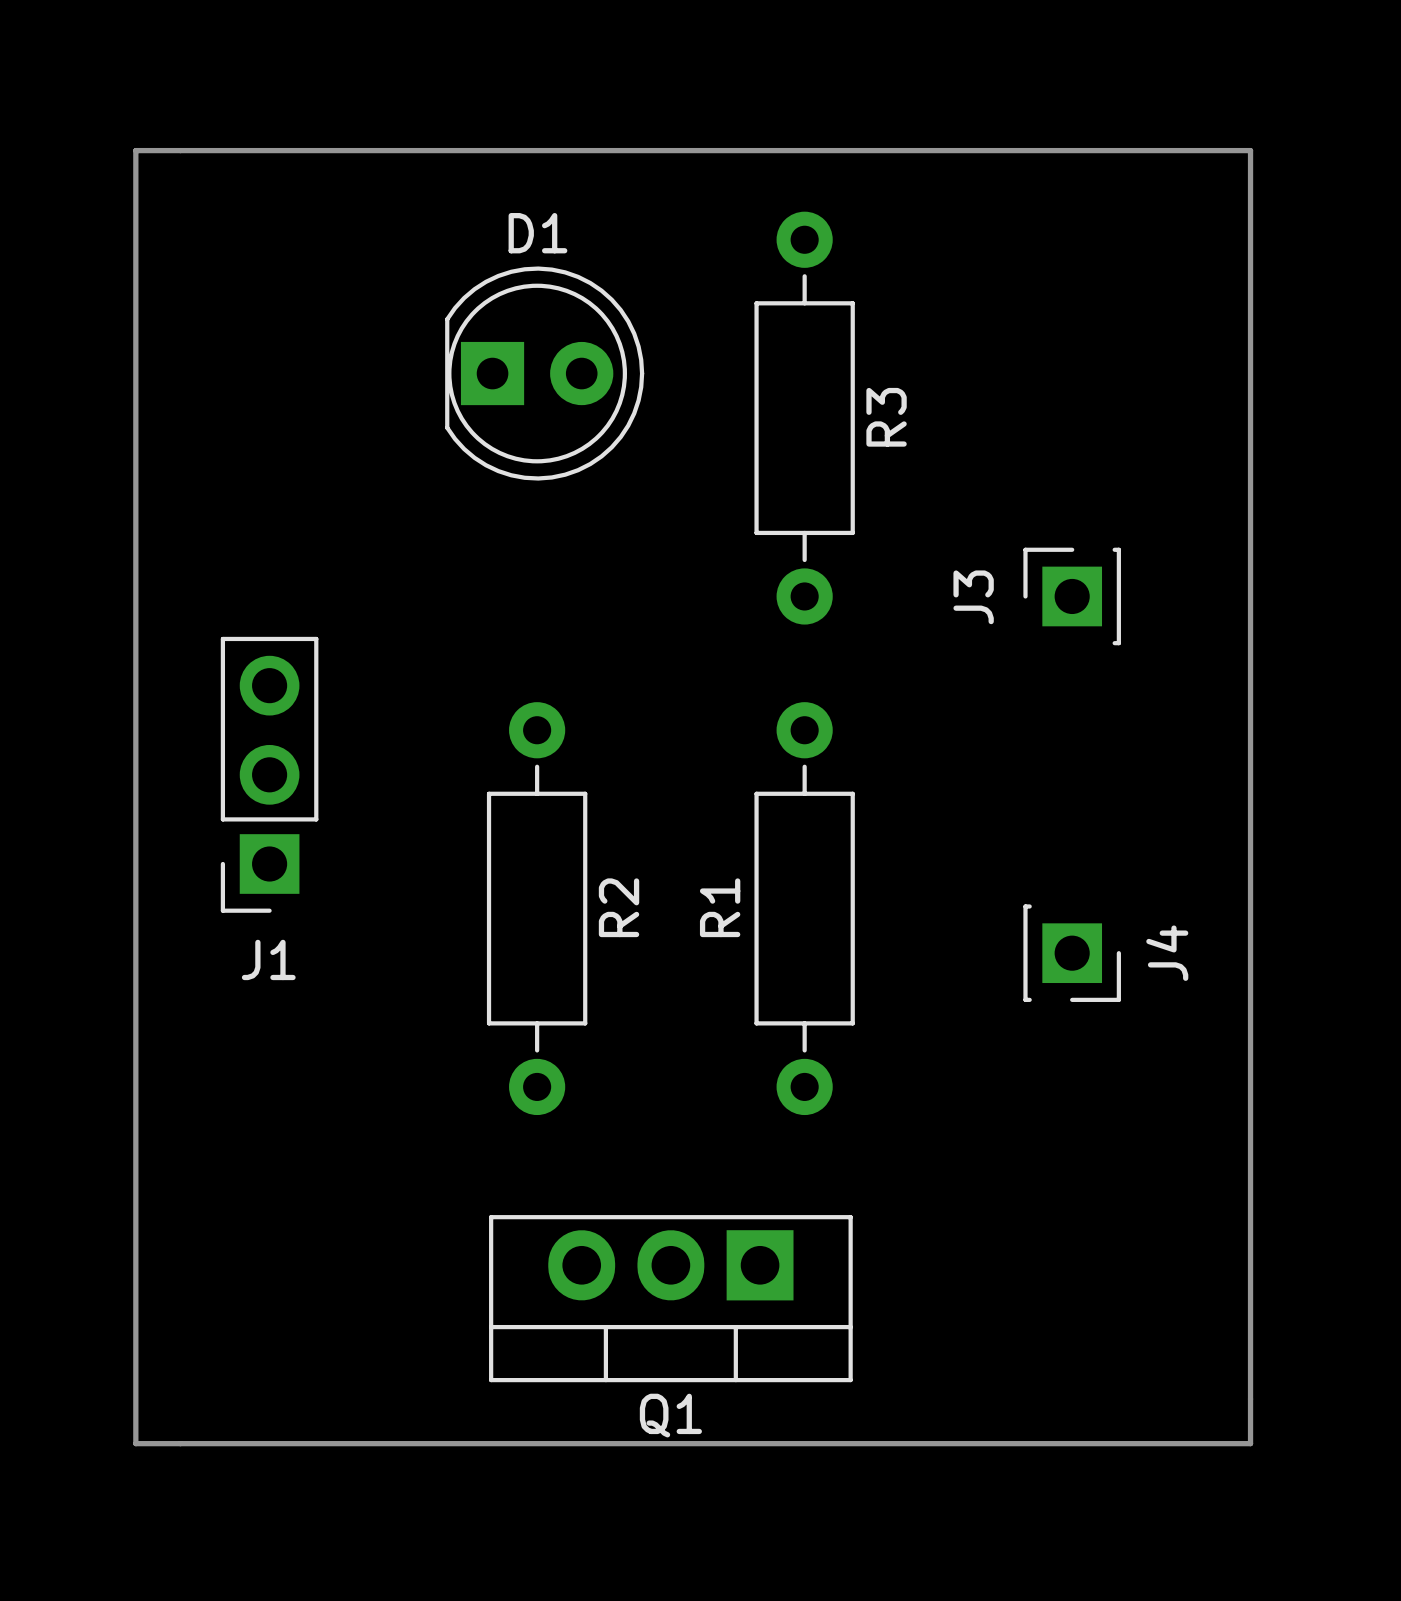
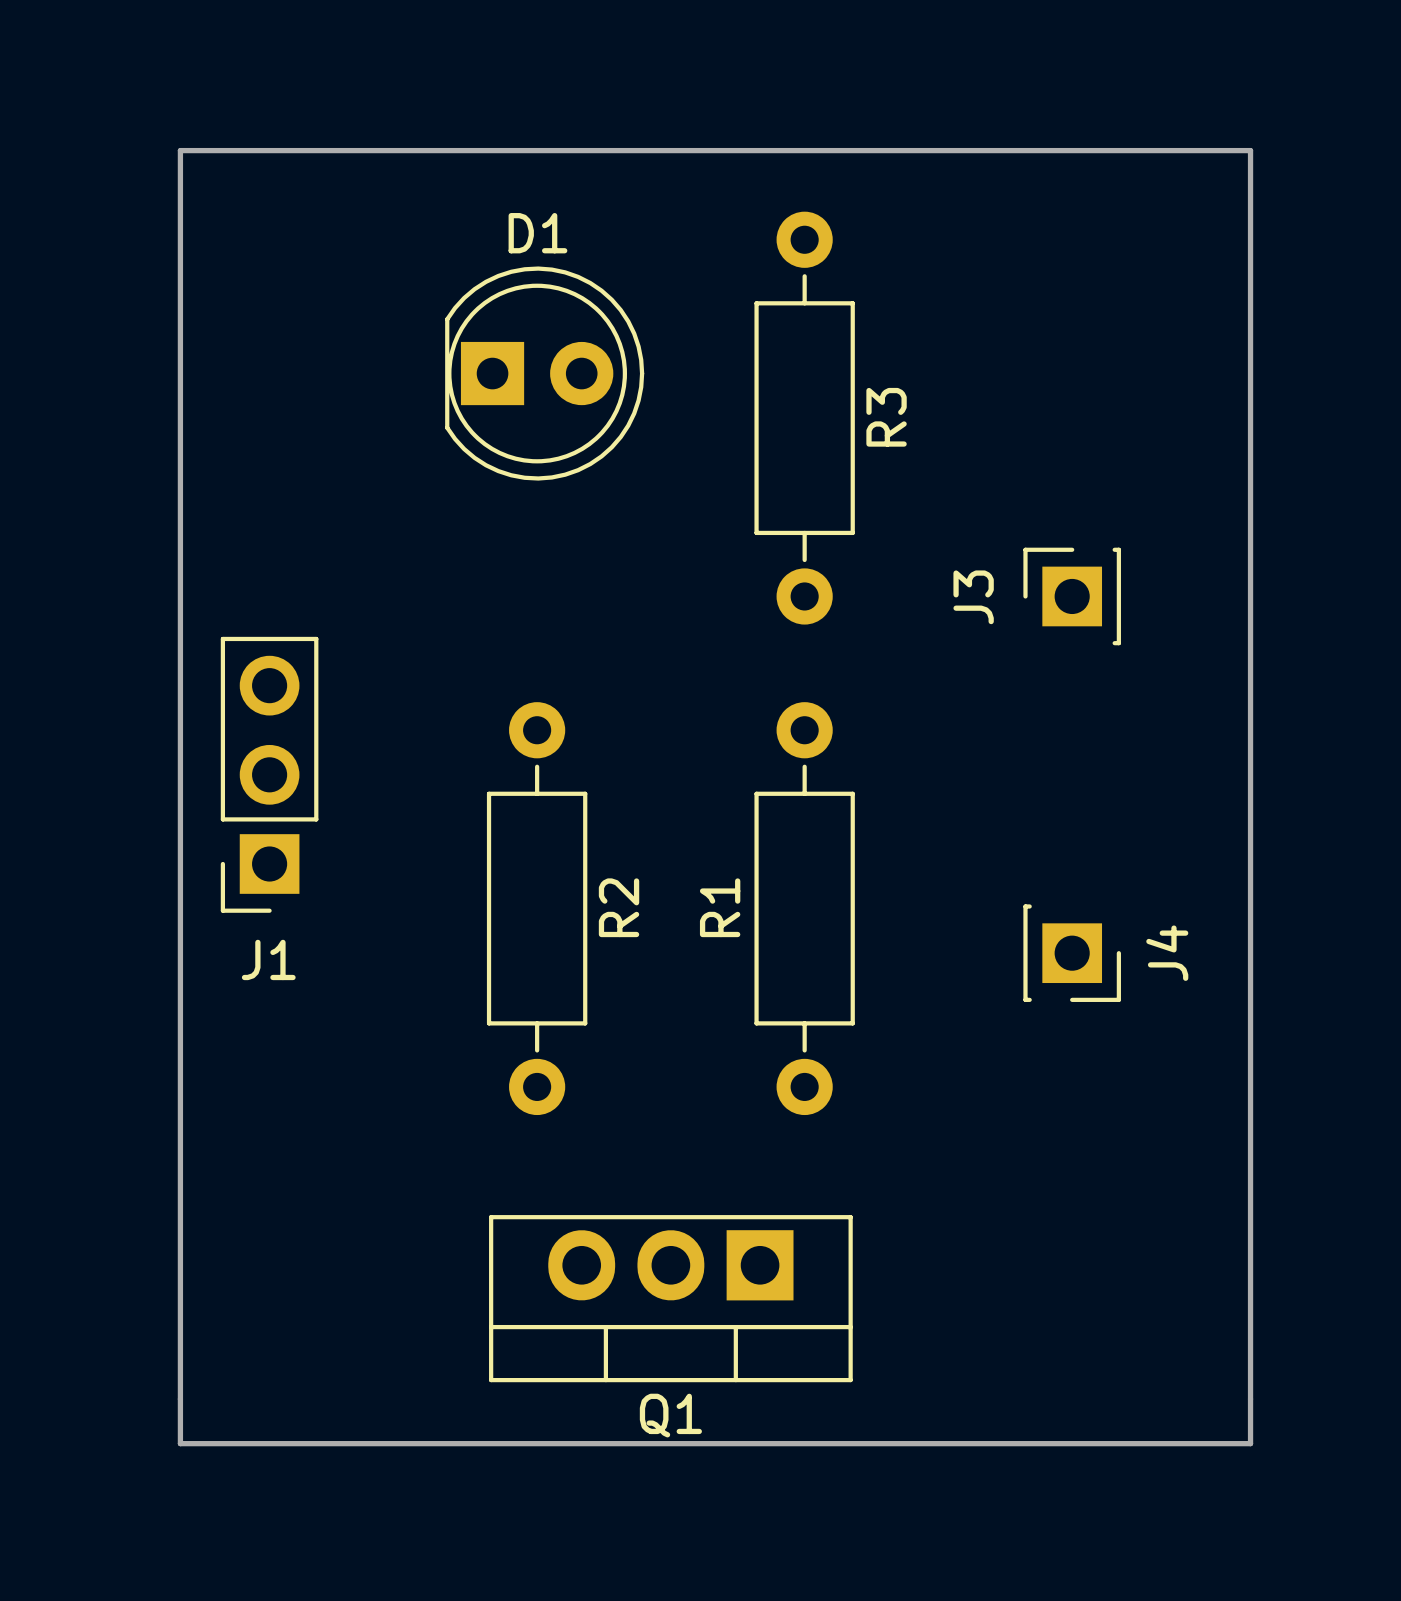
line: (180, 150) (135, 150) (135, 1443) (180, 1443) -> (180, 150) (180, 1443)

